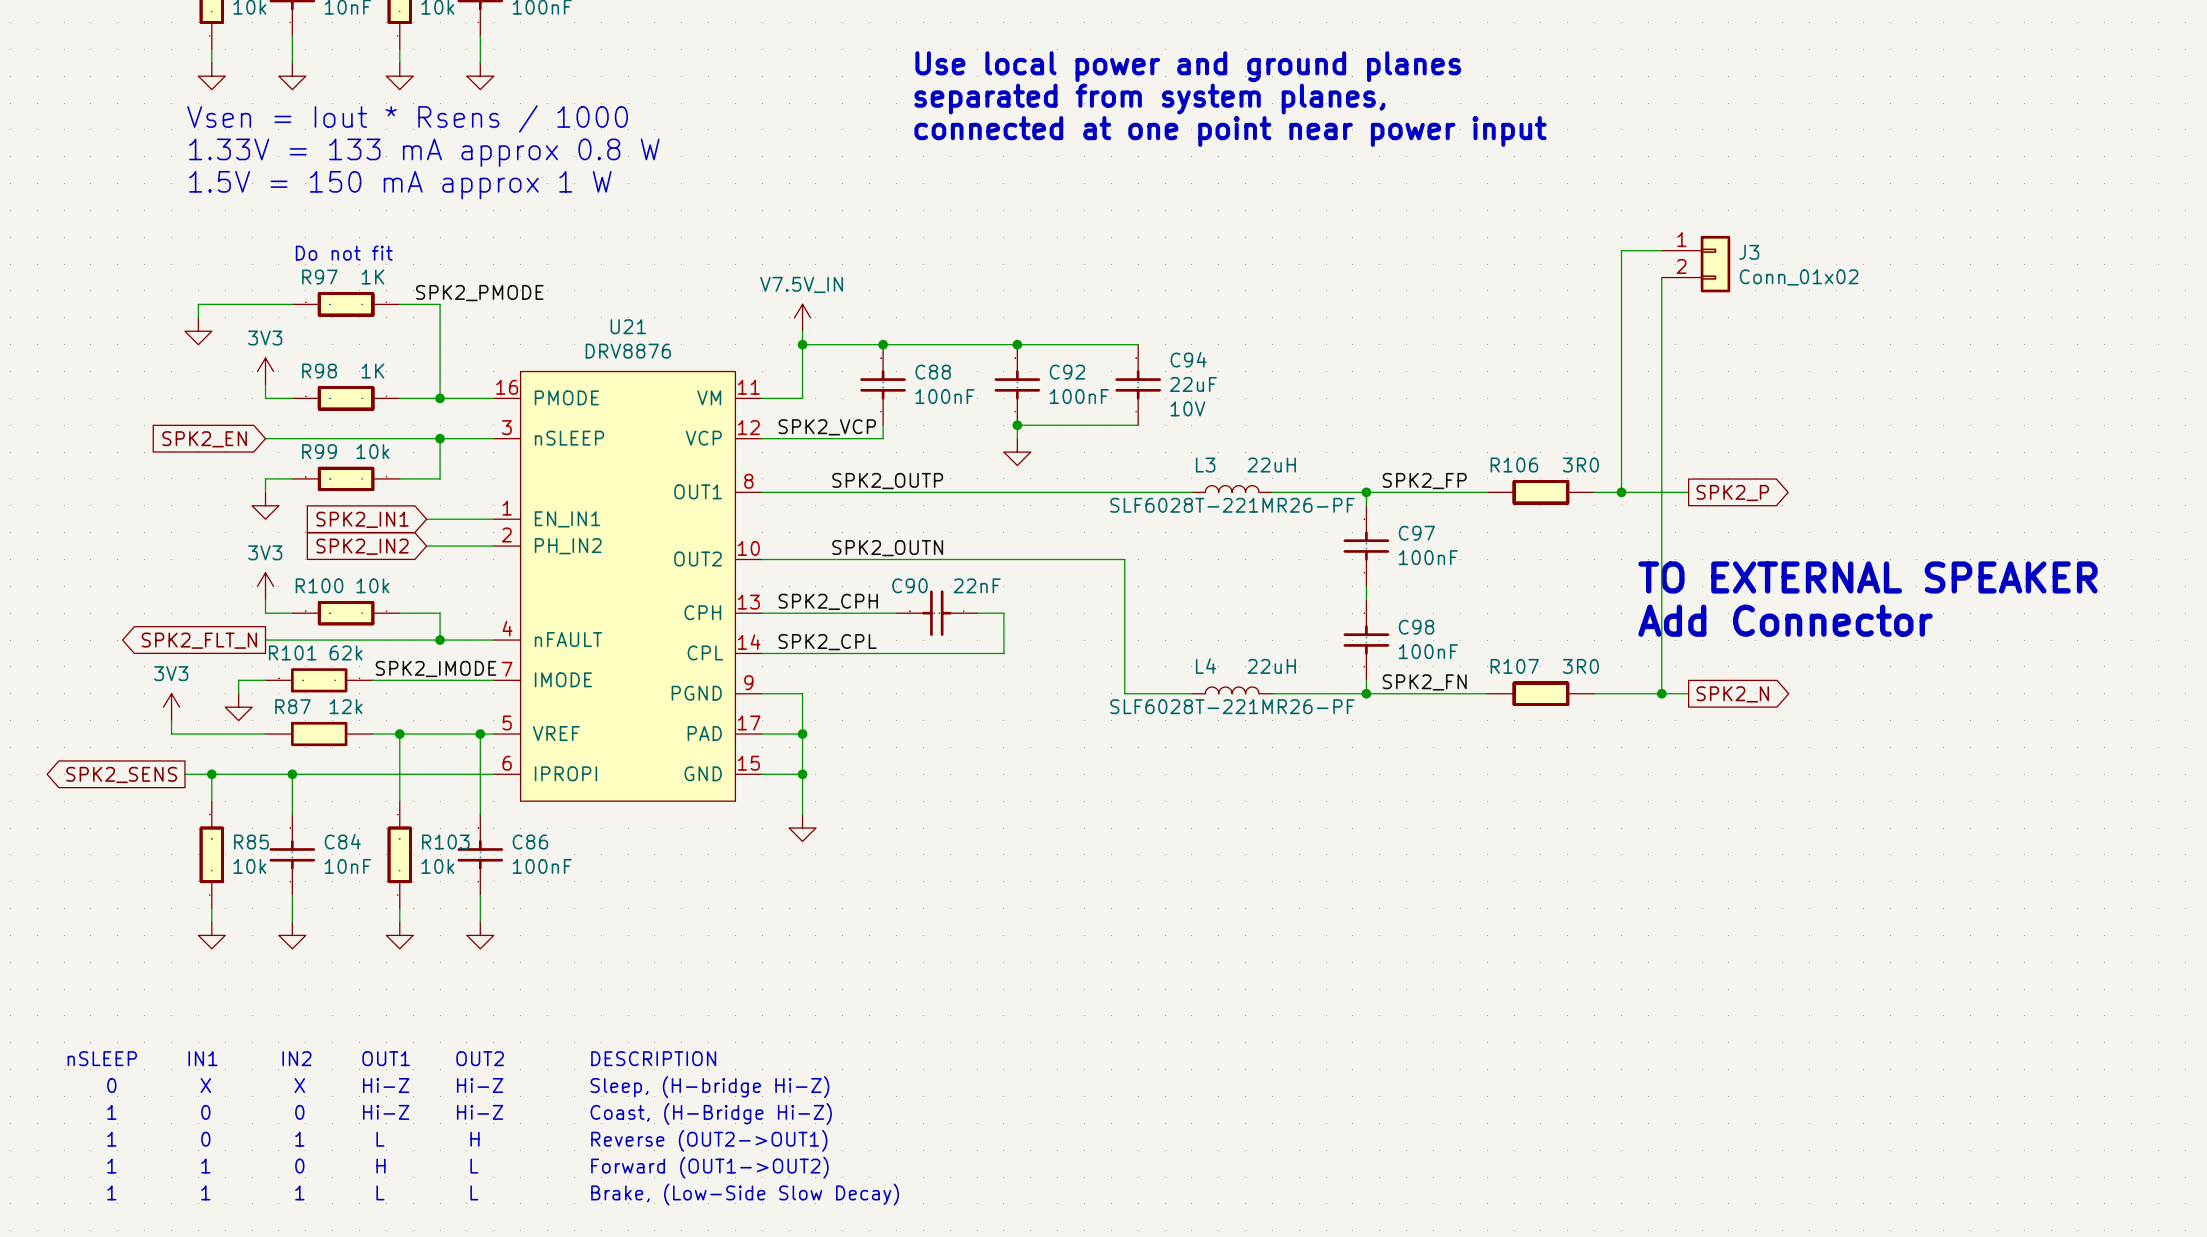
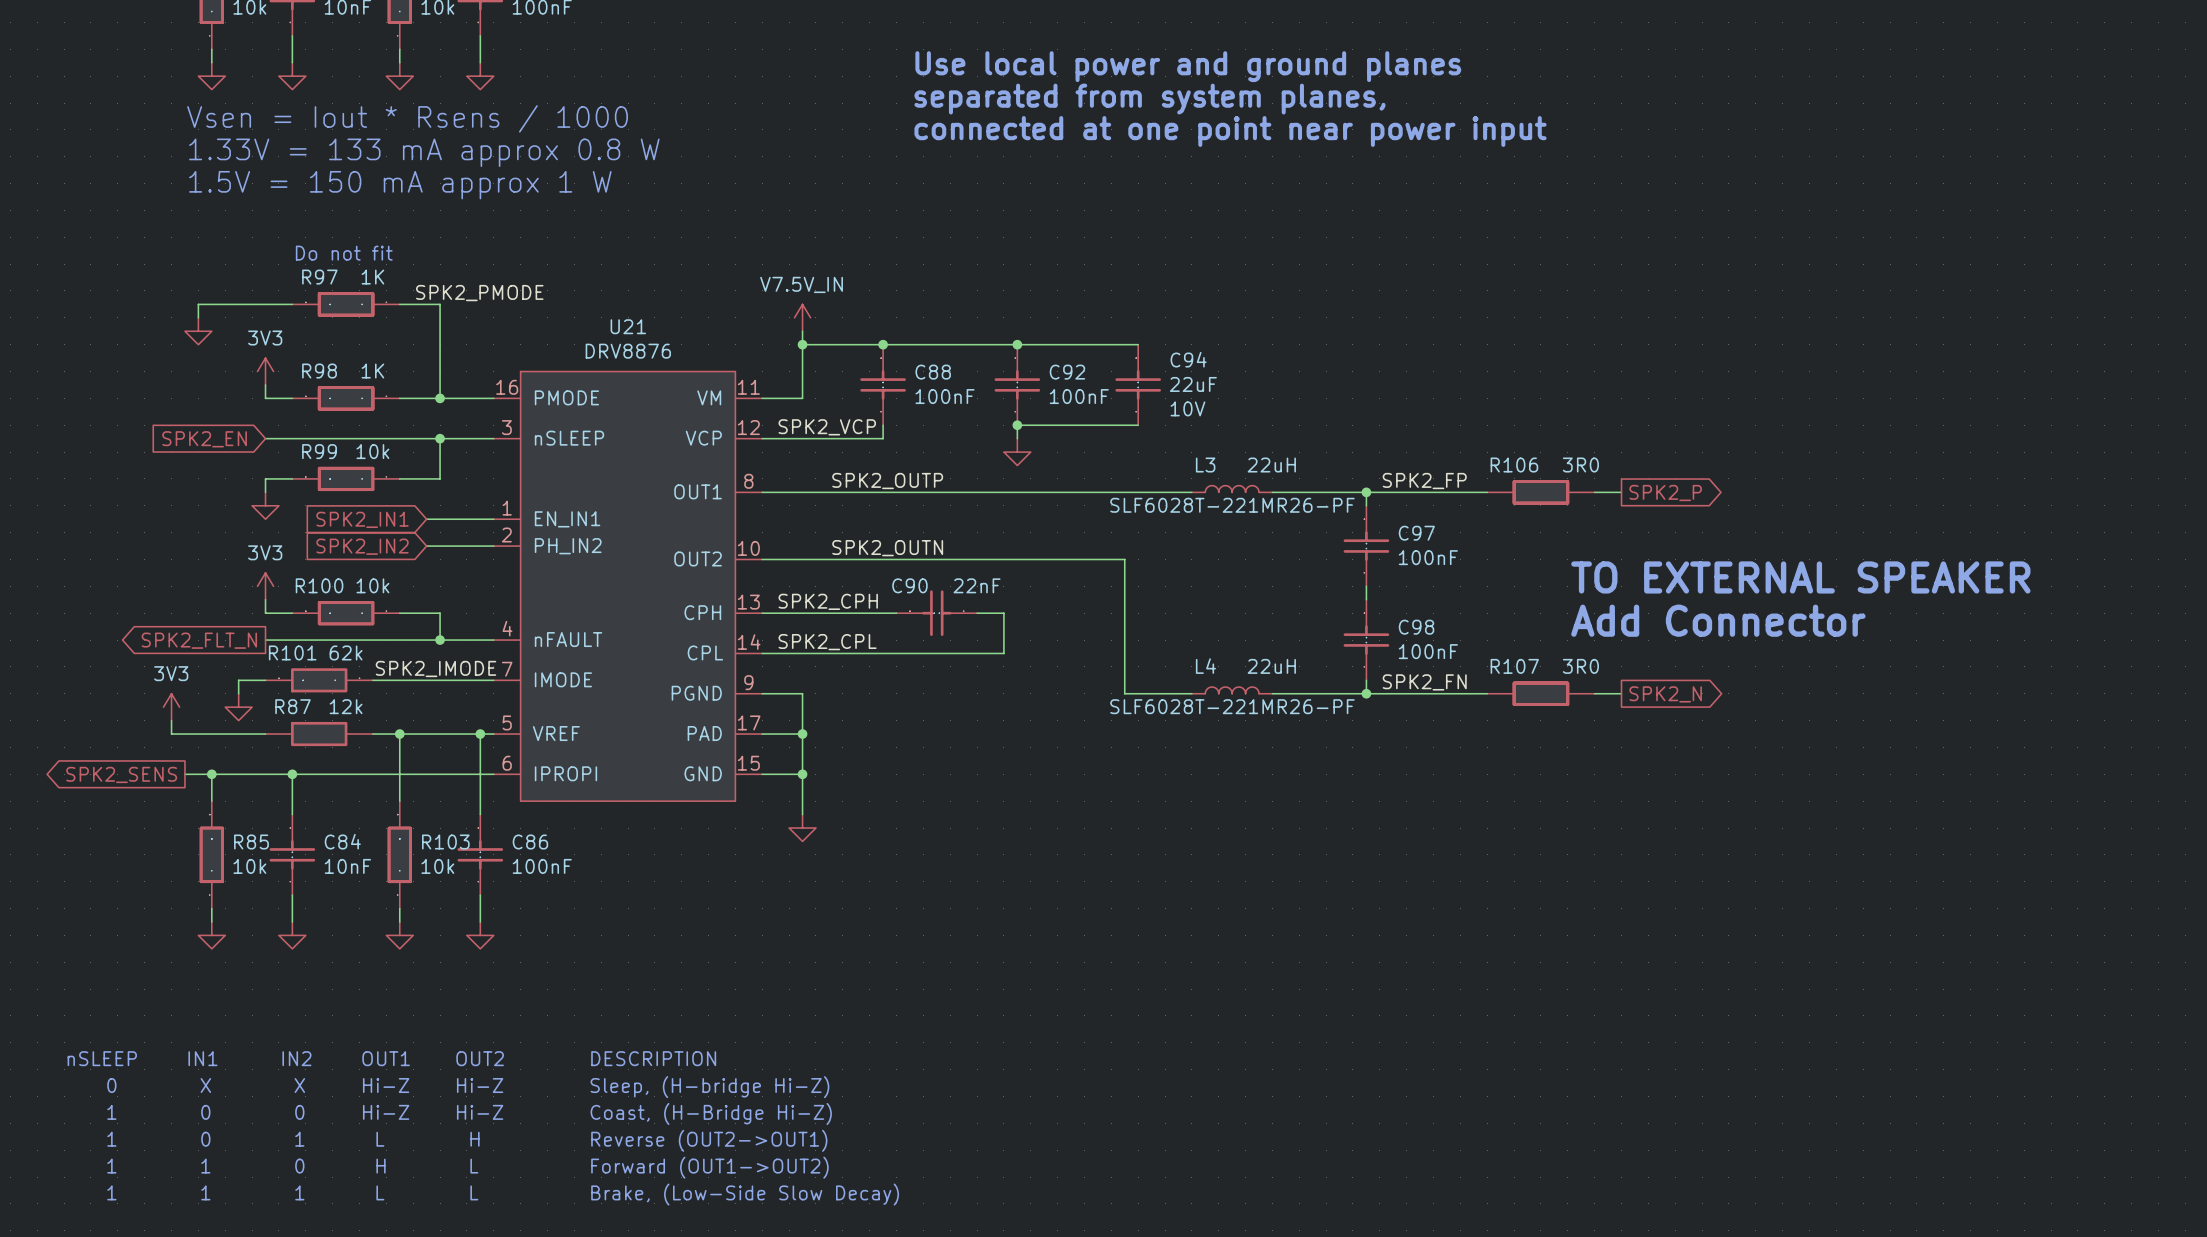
wire: (1661, 250) (1621, 250) (1621, 492) (1688, 492) -> none
J3: Conn_01x02 (1696, 264) -> none
wire: (1661, 277) (1661, 693) -> none
junction: (1621, 492) -> none
global label position: SPK2_P (1732, 493) -> SPK2_P (1665, 493)
text position: TO EXTERNAL SPEAKER (1867, 577) -> TO EXTERNAL SPEAKER (1800, 577)
text position: Add Connector (1785, 620) -> Add Connector (1718, 620)
wire: (1621, 693) (1688, 693) -> none
junction: (1661, 693) -> none
global label position: SPK2_N (1732, 694) -> SPK2_N (1665, 694)

